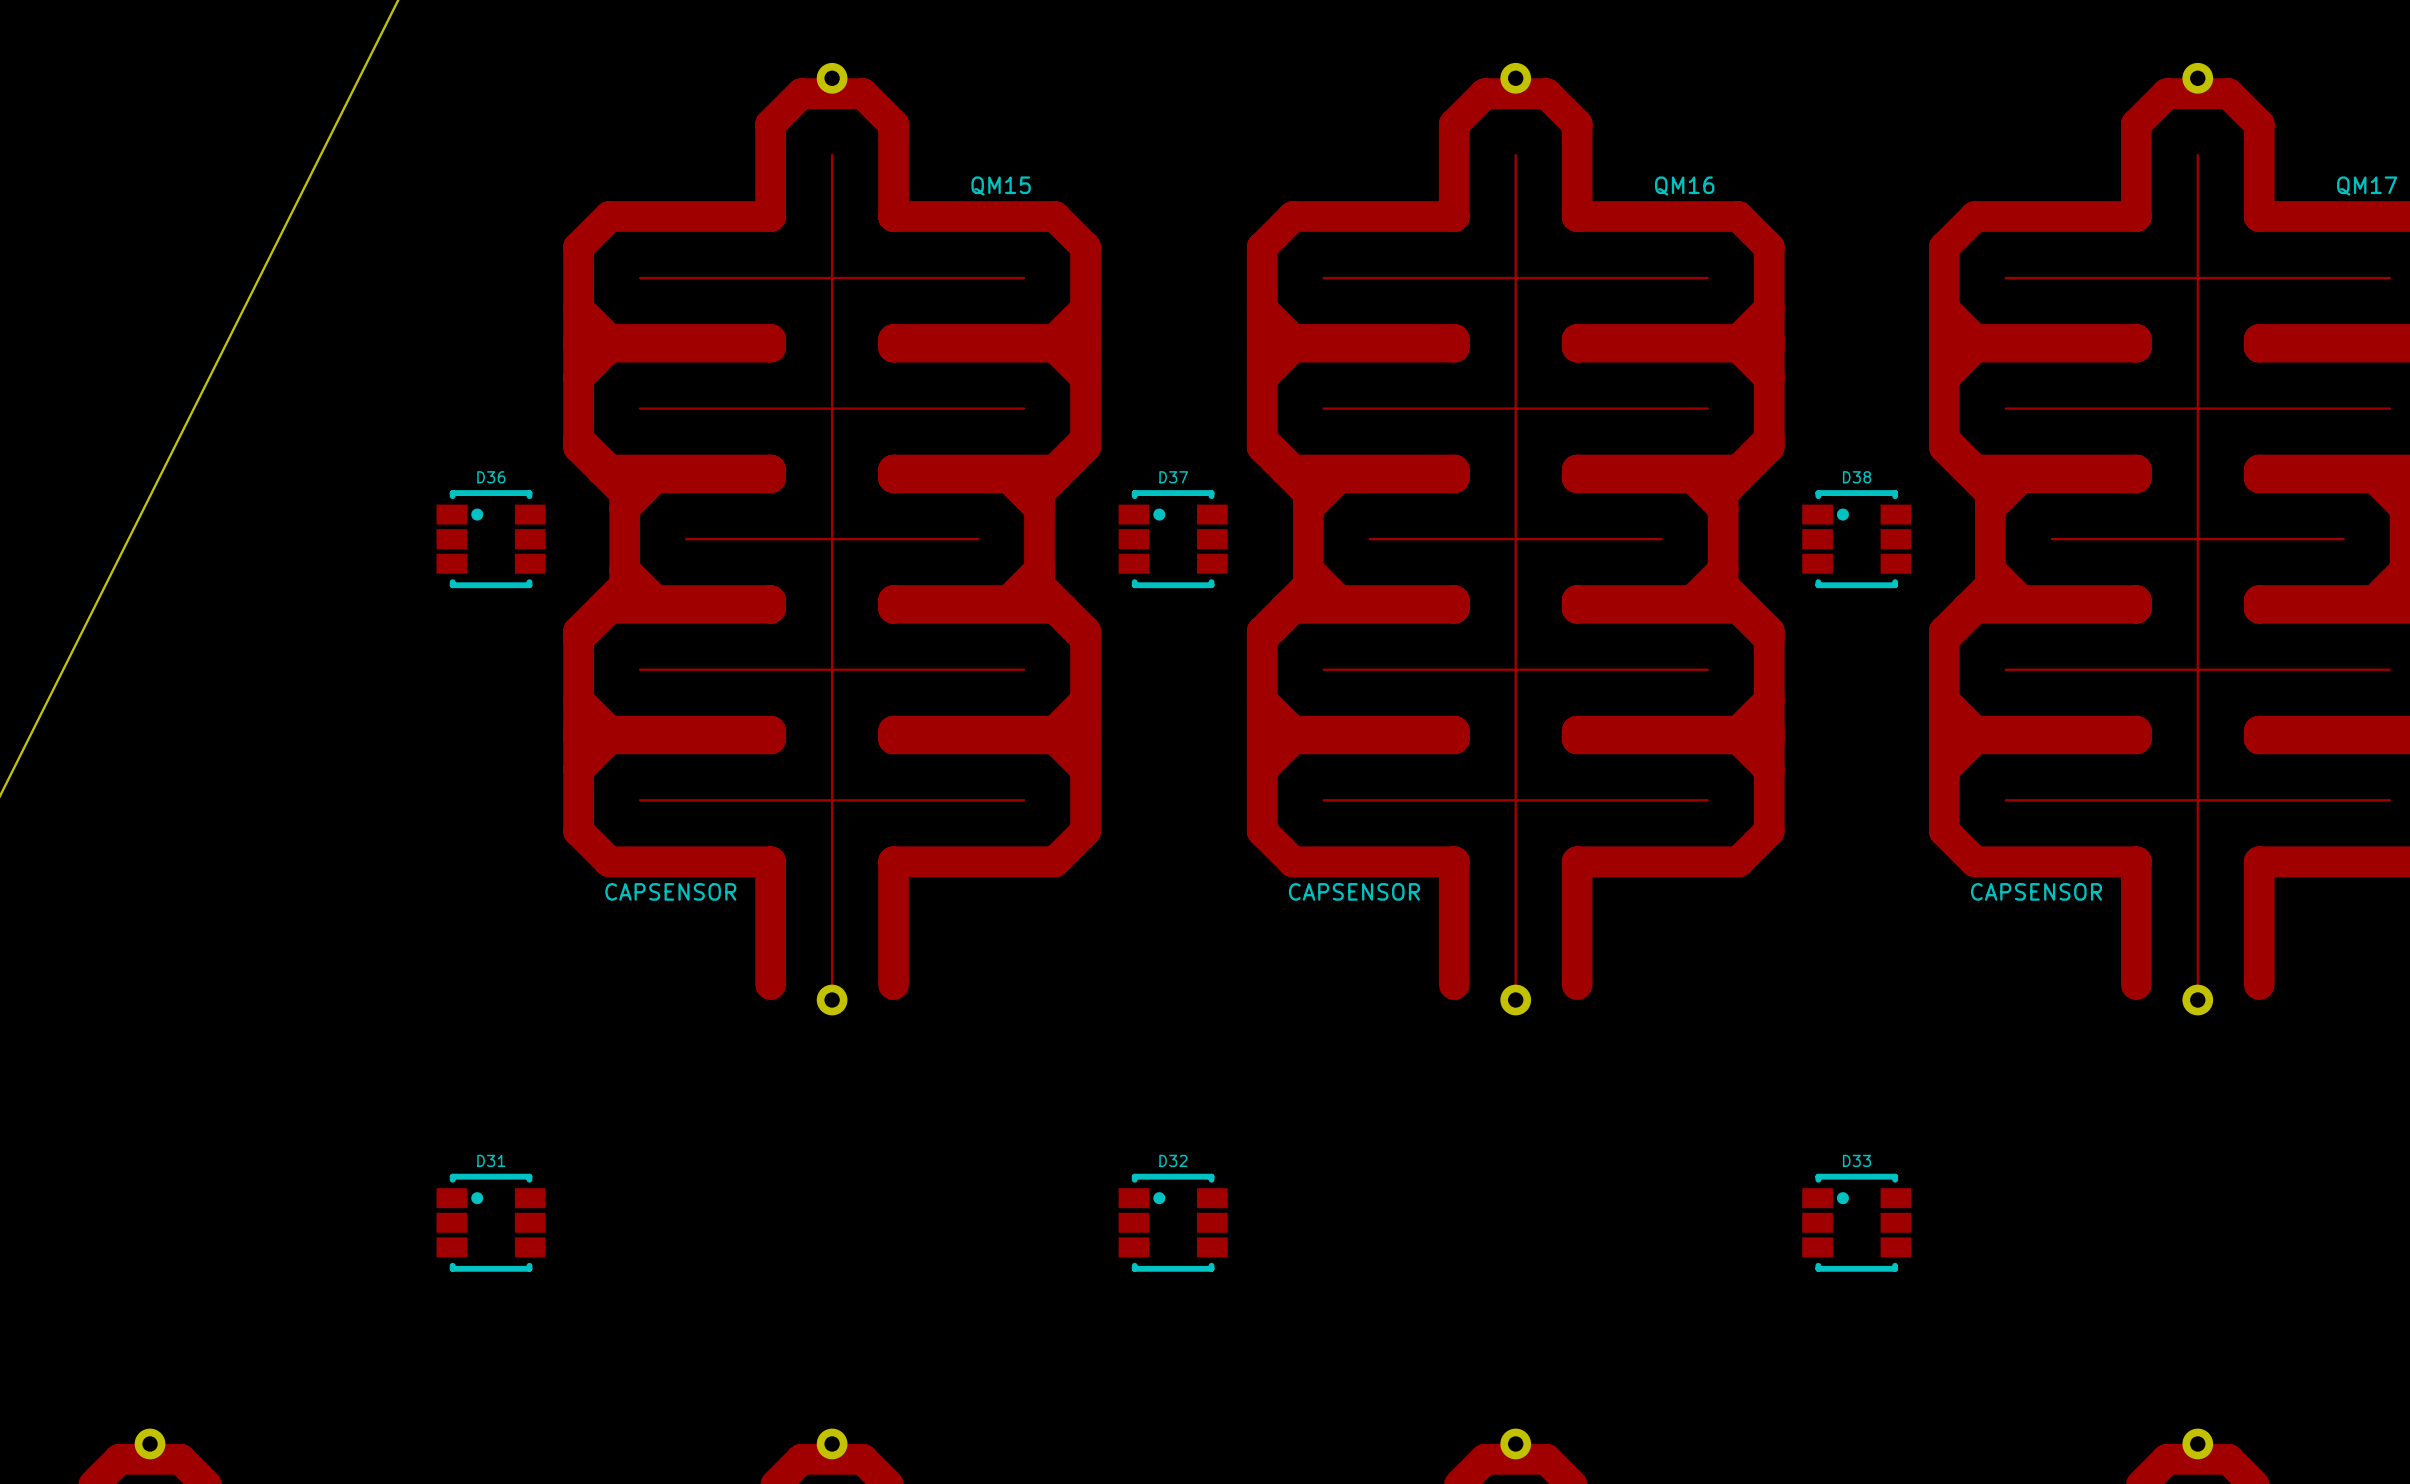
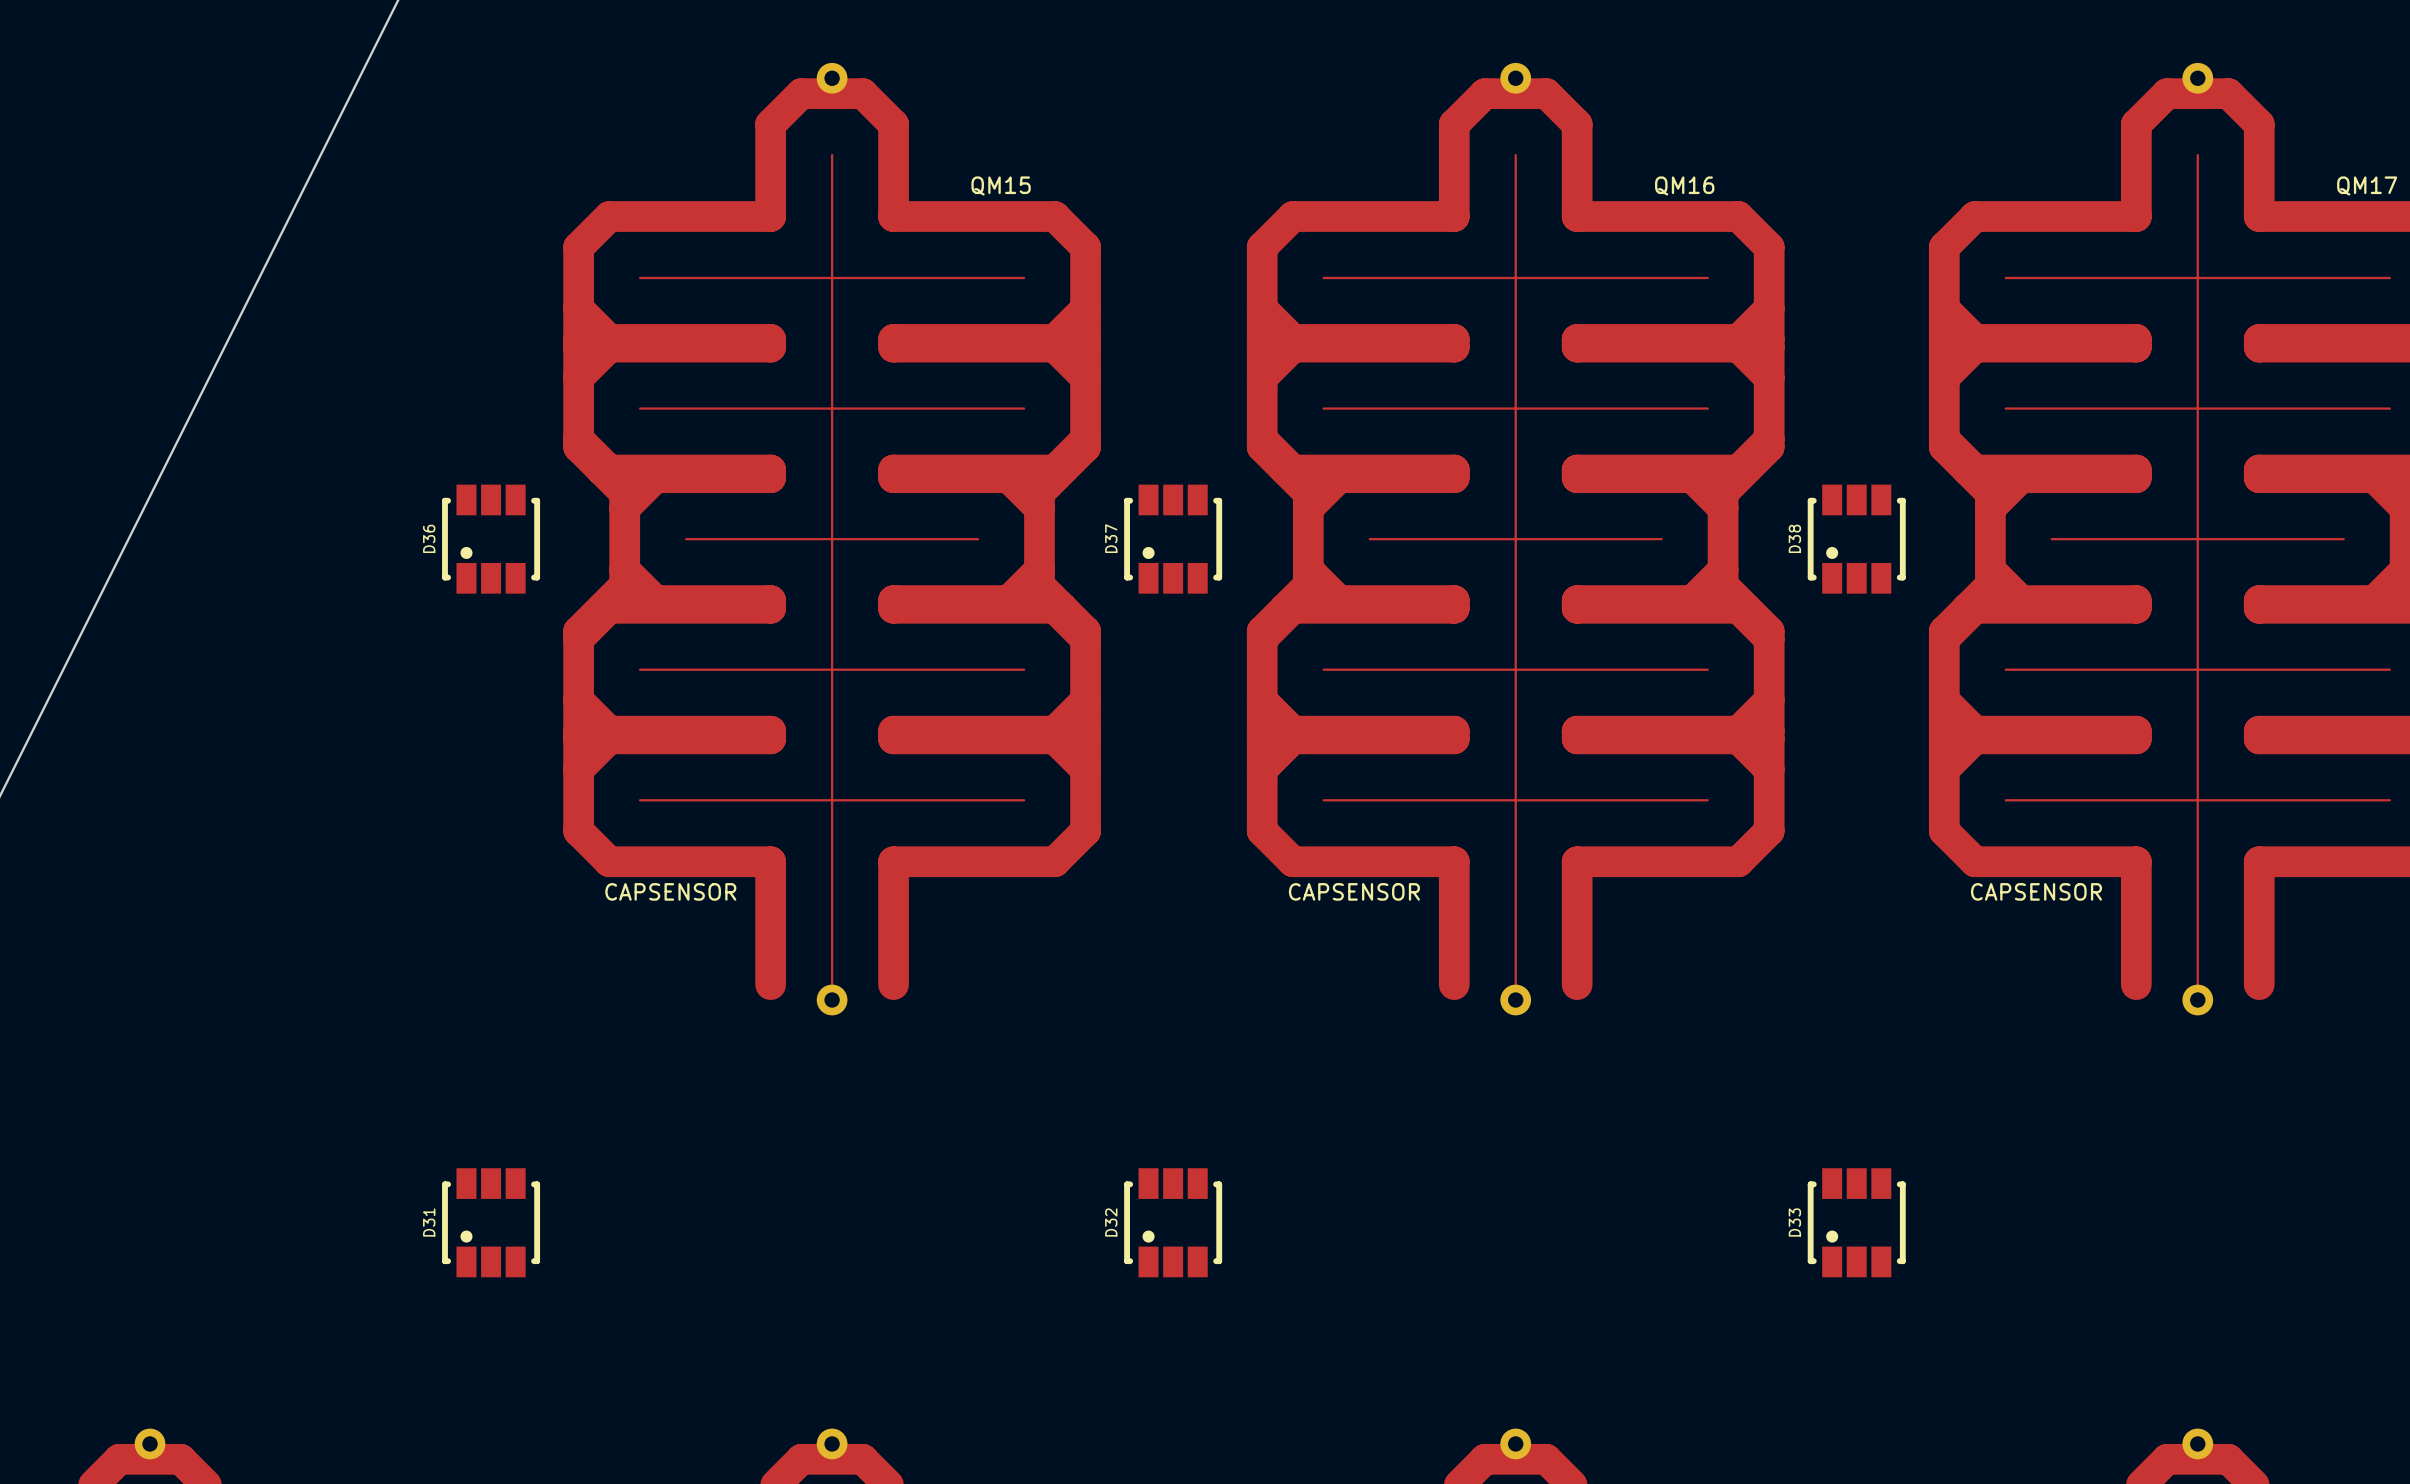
D36 rotation: 0° (491, 539) -> 90° counterclockwise (491, 539)
D37 rotation: 0° (1173, 539) -> 90° counterclockwise (1173, 539)
D38 rotation: 0° (1856, 539) -> 90° counterclockwise (1856, 539)
D31 rotation: 0° (491, 1222) -> 90° counterclockwise (491, 1222)
D32 rotation: 0° (1173, 1222) -> 90° counterclockwise (1173, 1222)
D33 rotation: 0° (1856, 1222) -> 90° counterclockwise (1856, 1222)

